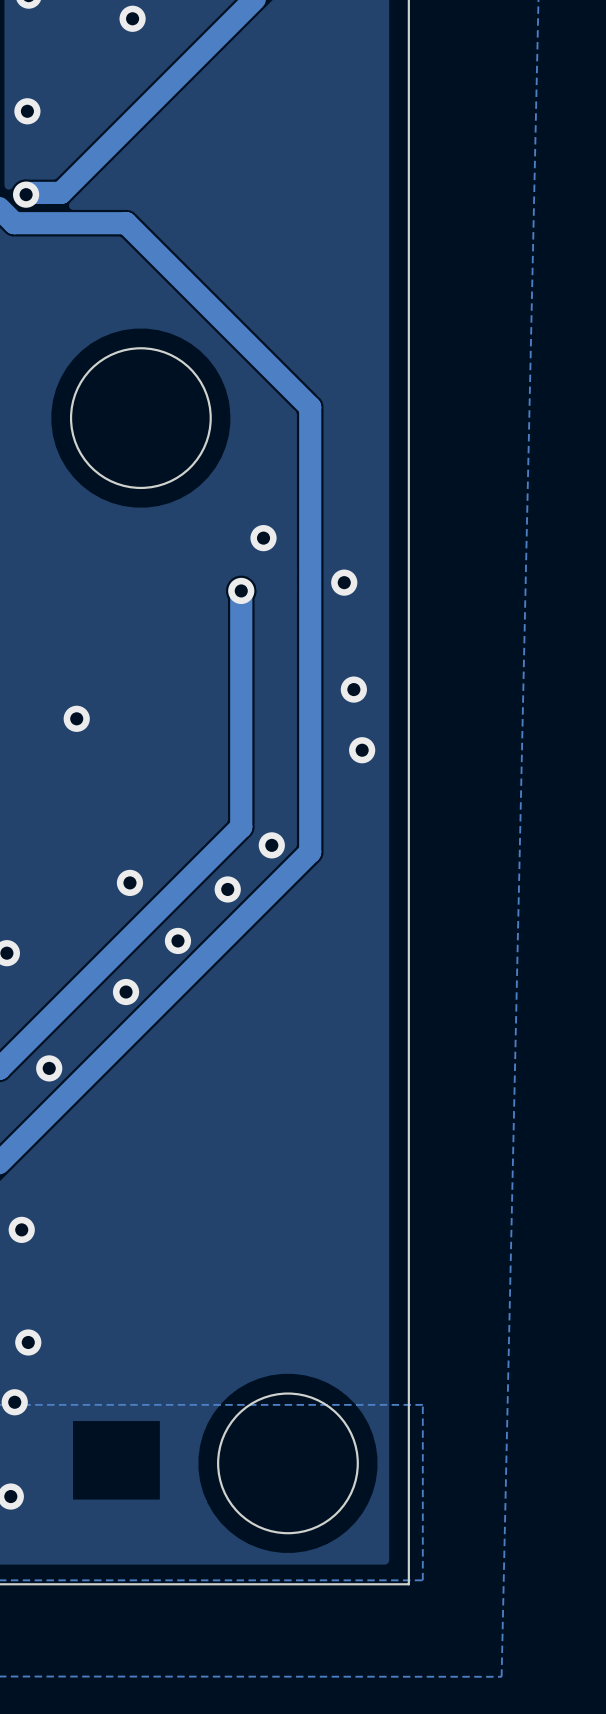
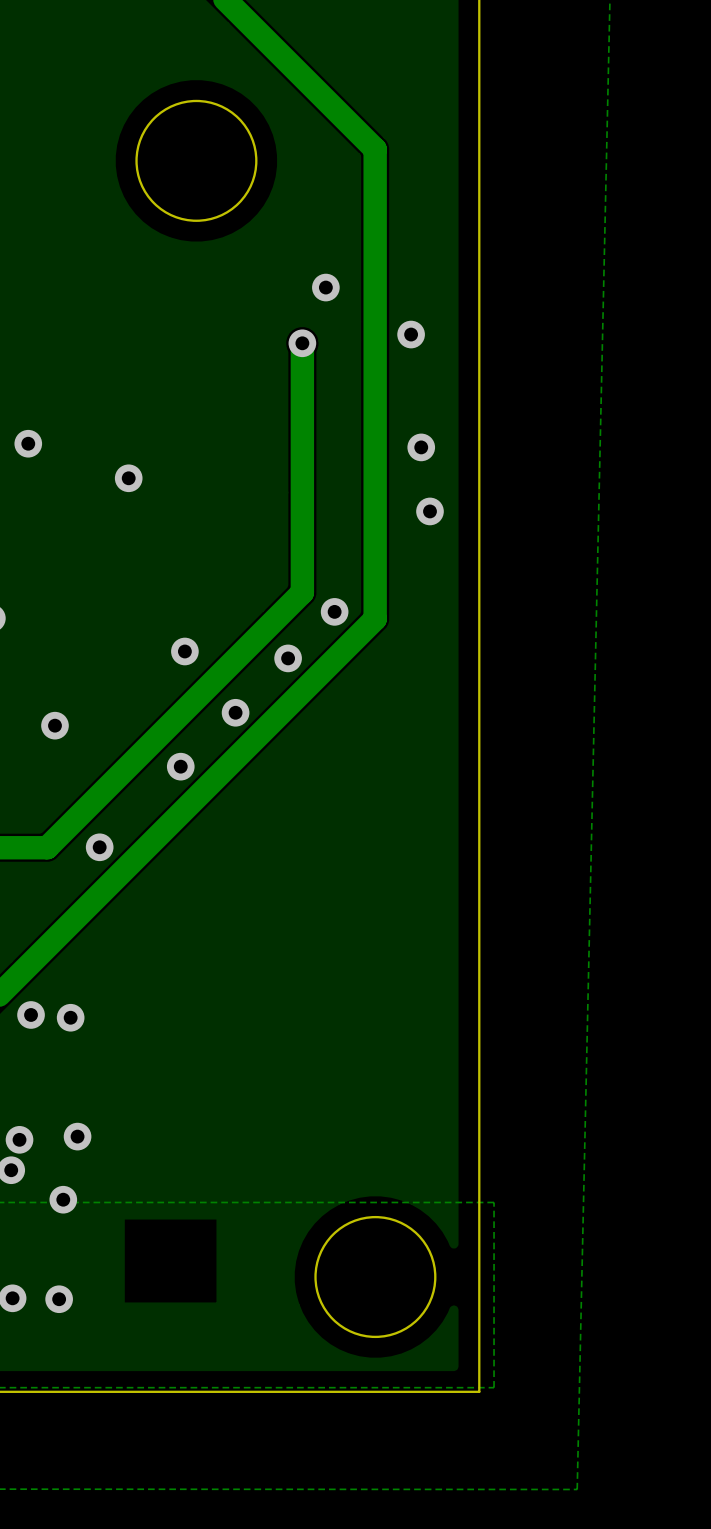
round board edge size: [69, 347, 212, 490] -> [135, 99, 258, 222]
round board edge size: [217, 1392, 359, 1535] -> [314, 1215, 437, 1339]

